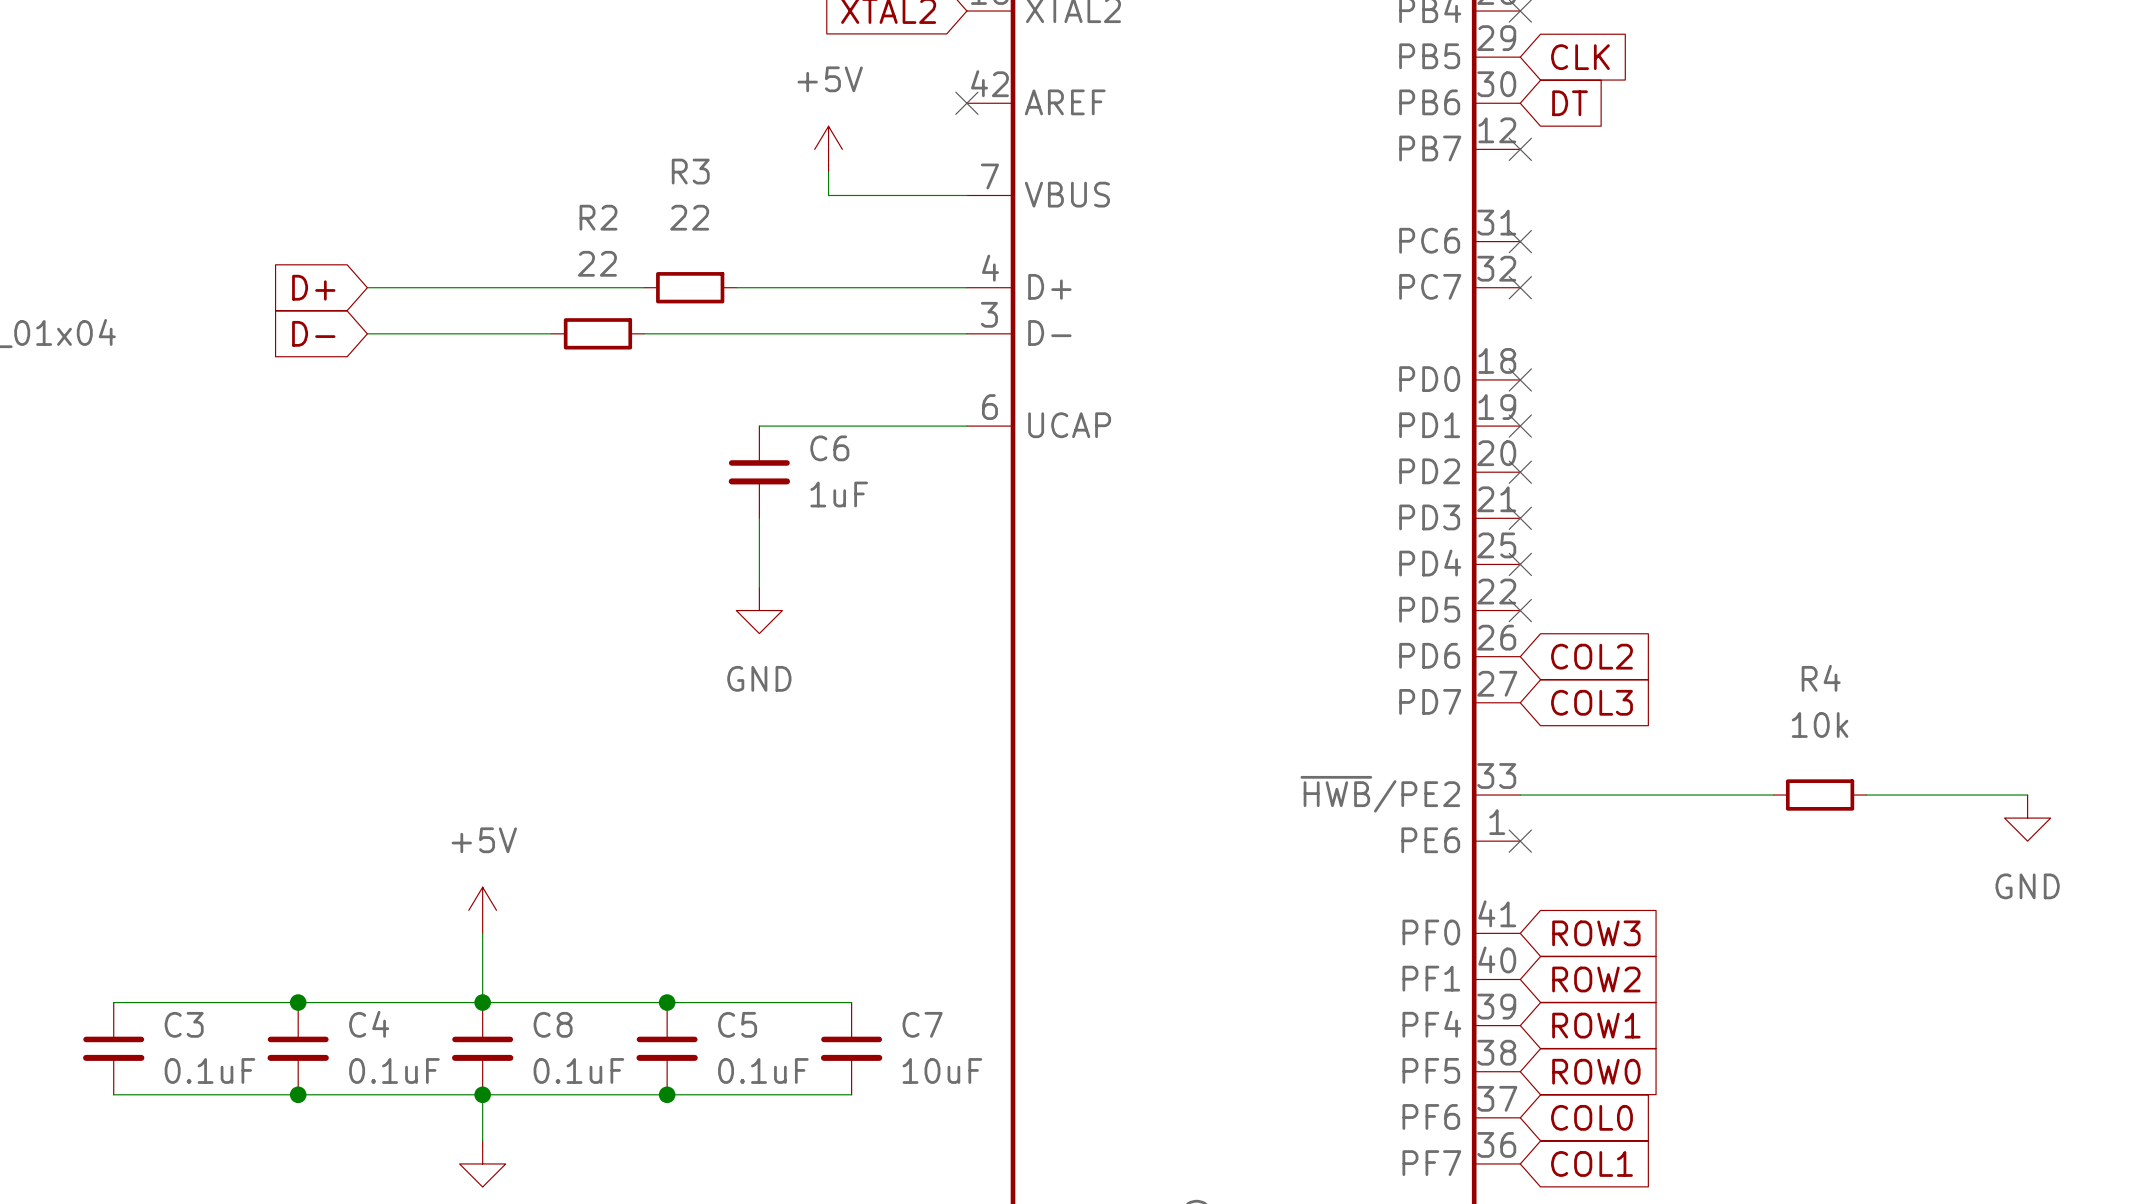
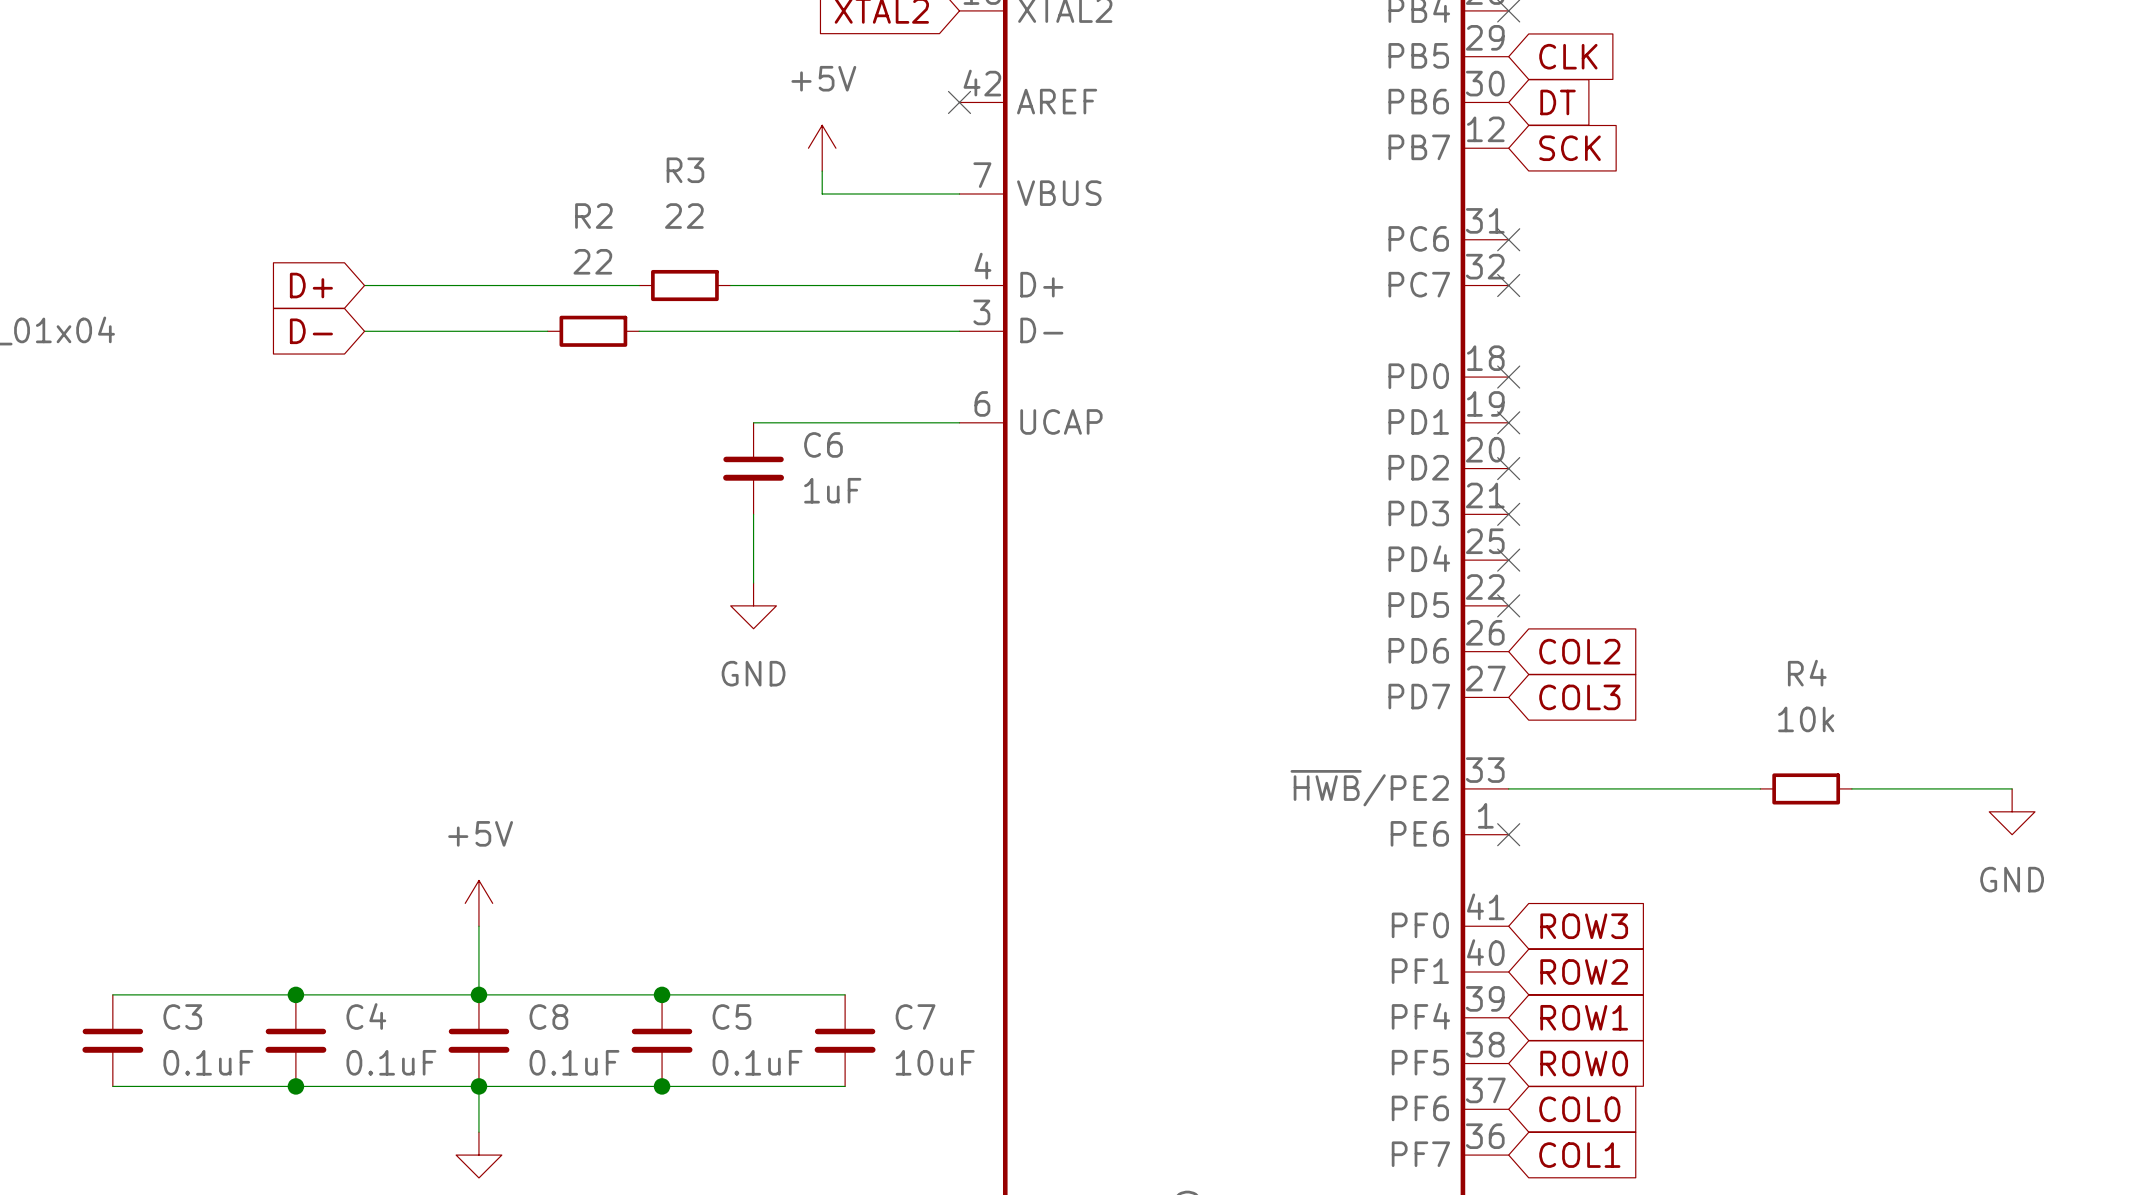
no-connect mark: (1520, 149) -> none
global label: none -> SCK (1570, 148)

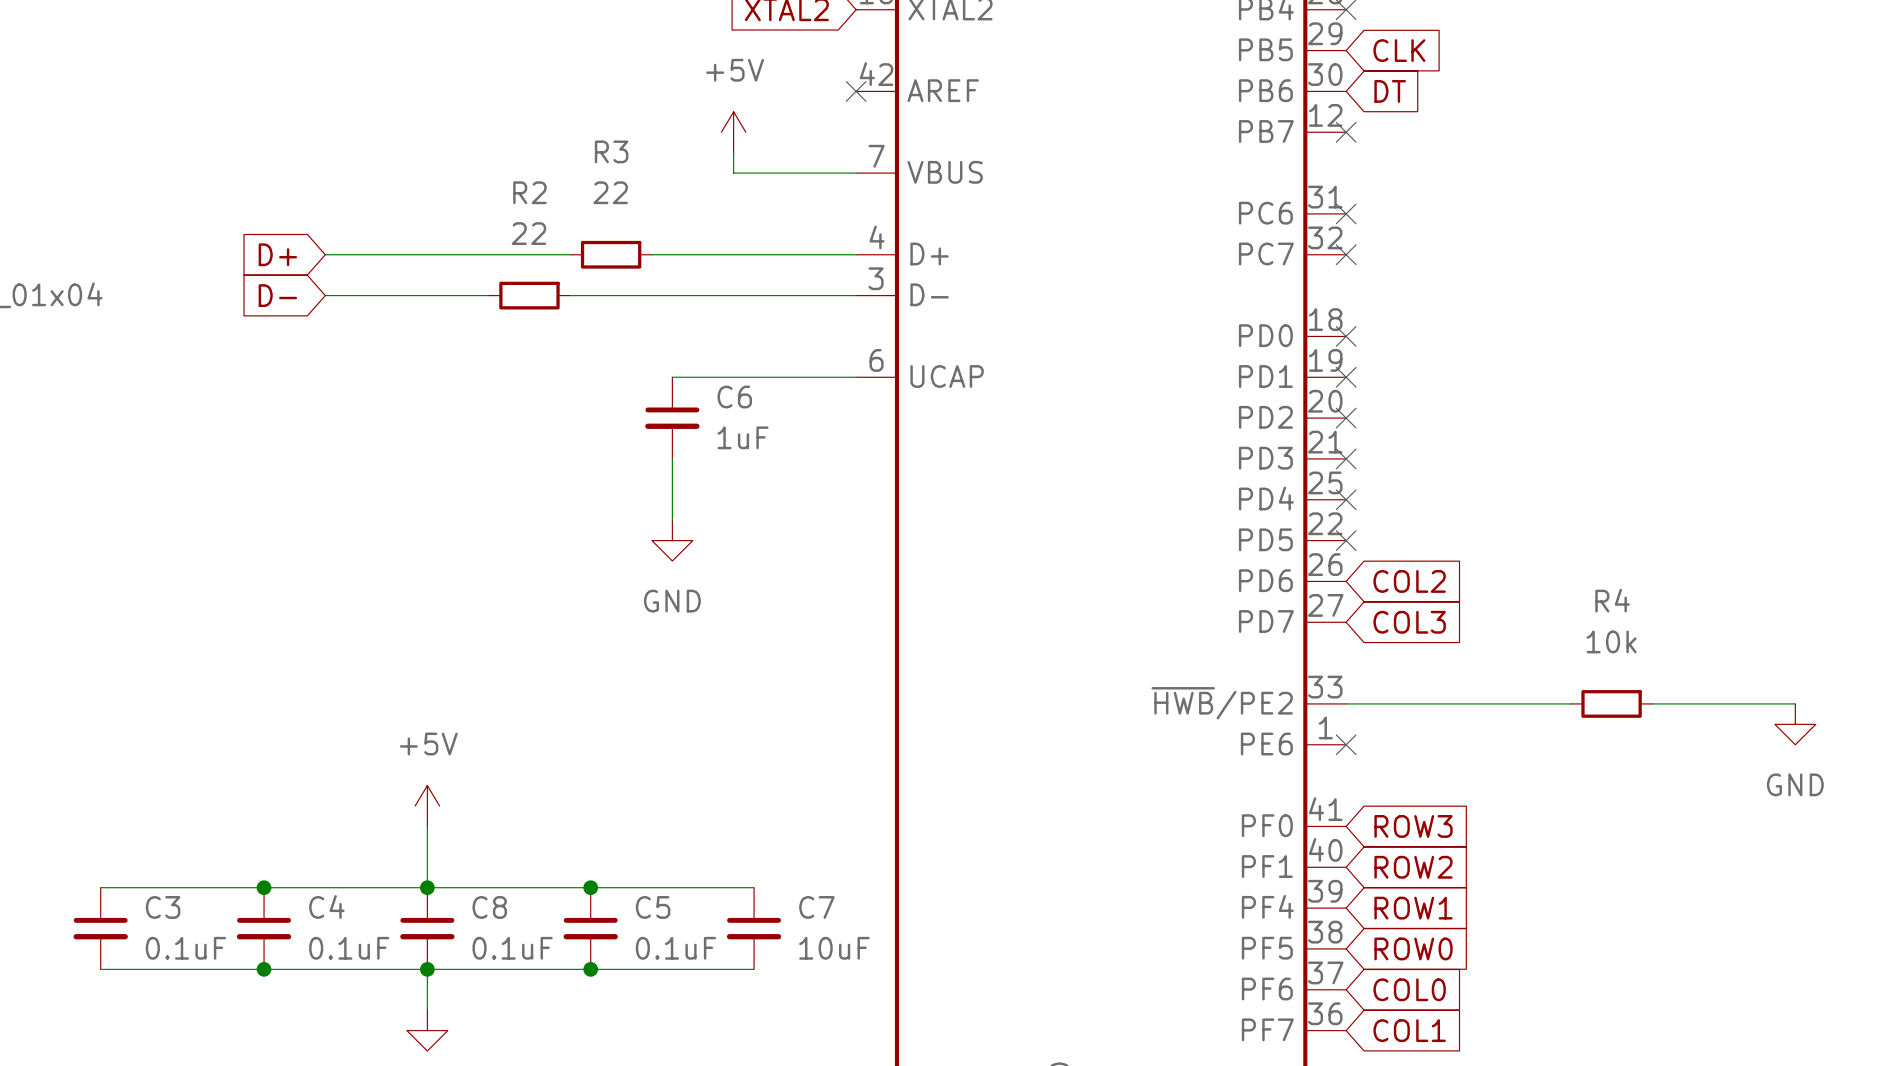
no-connect mark: none -> (1346, 132)
global label: SCK (1570, 148) -> none

